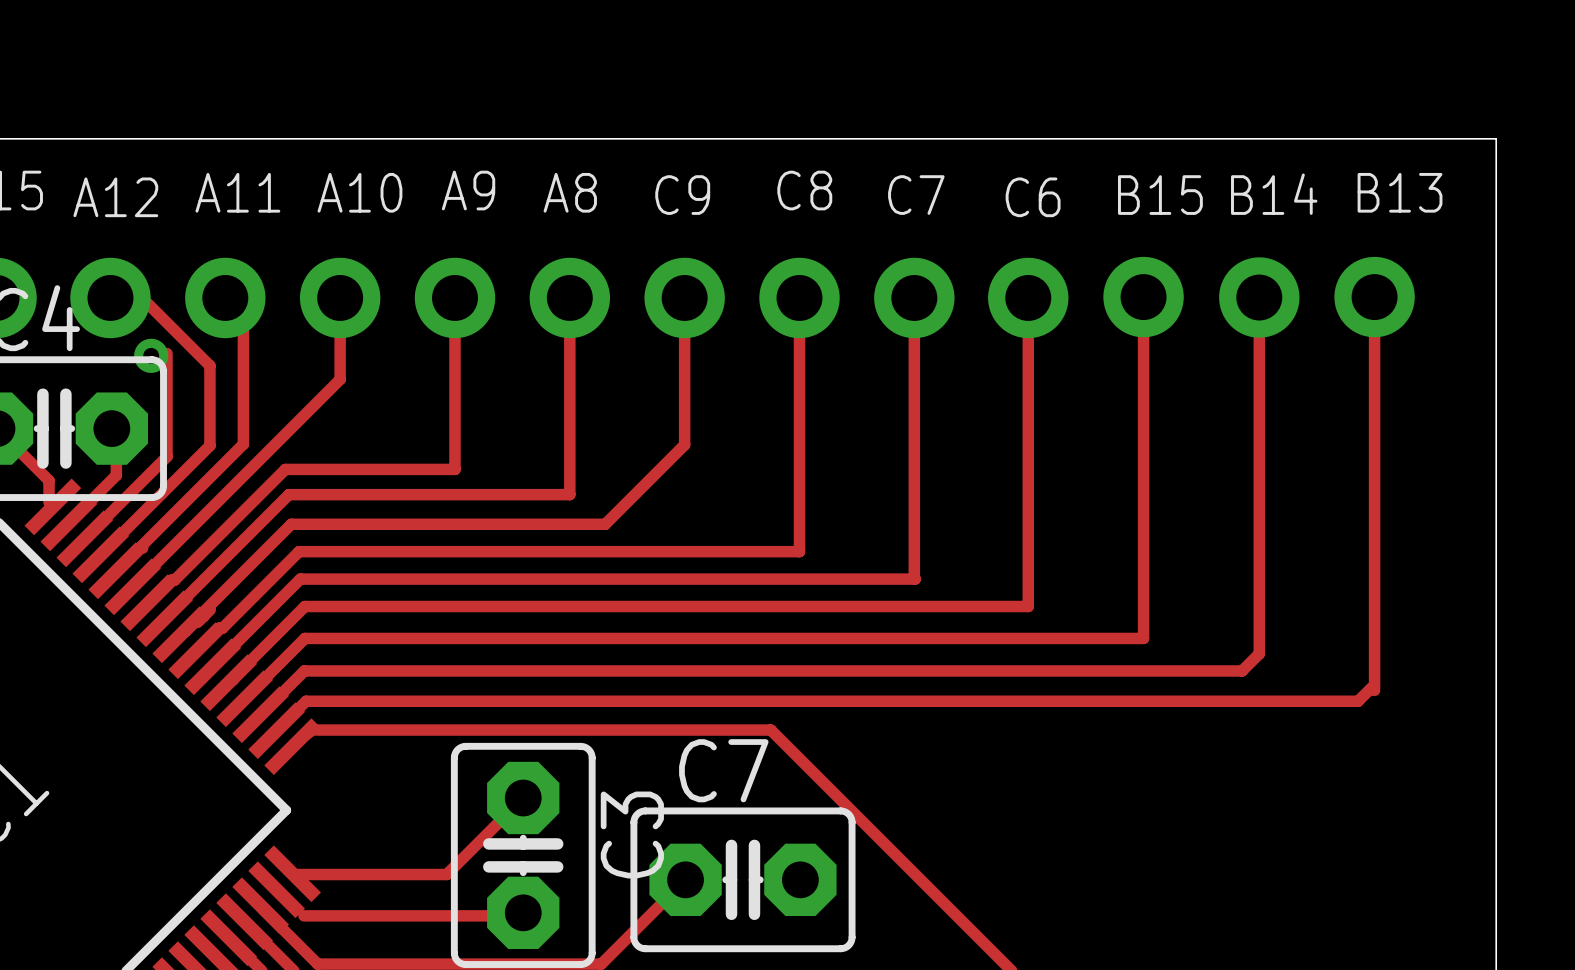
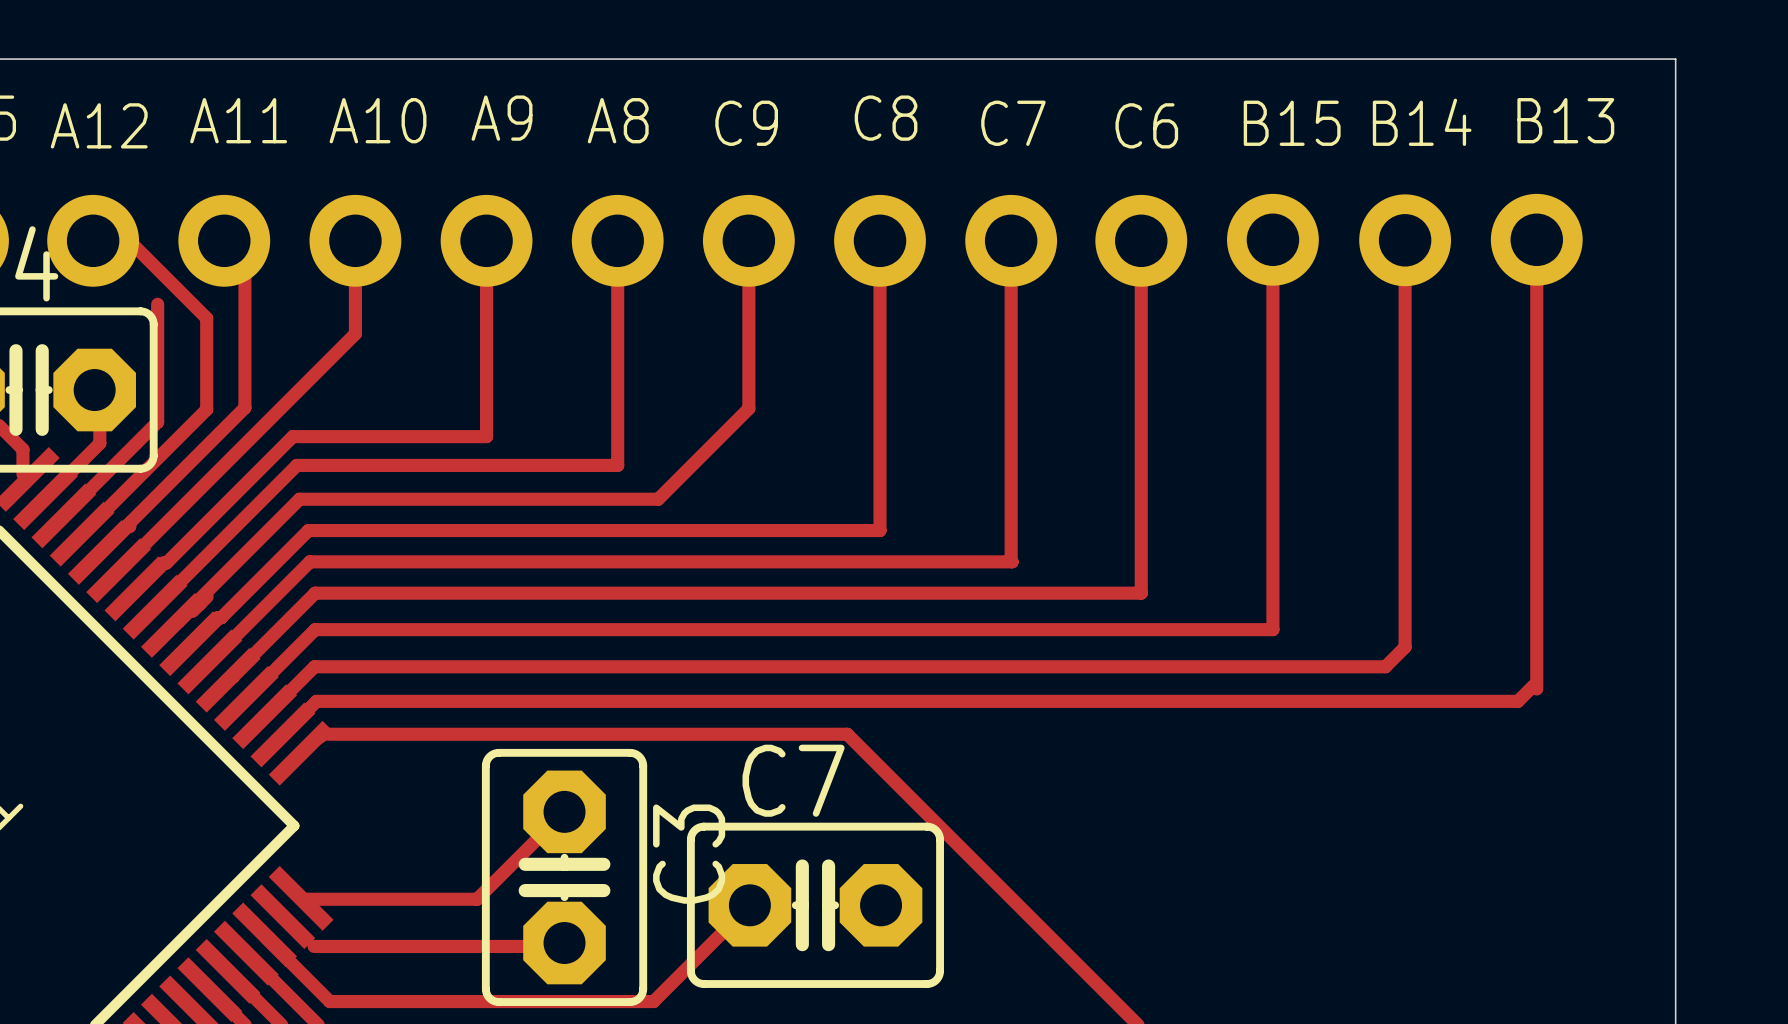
via: (151, 355) -> none

